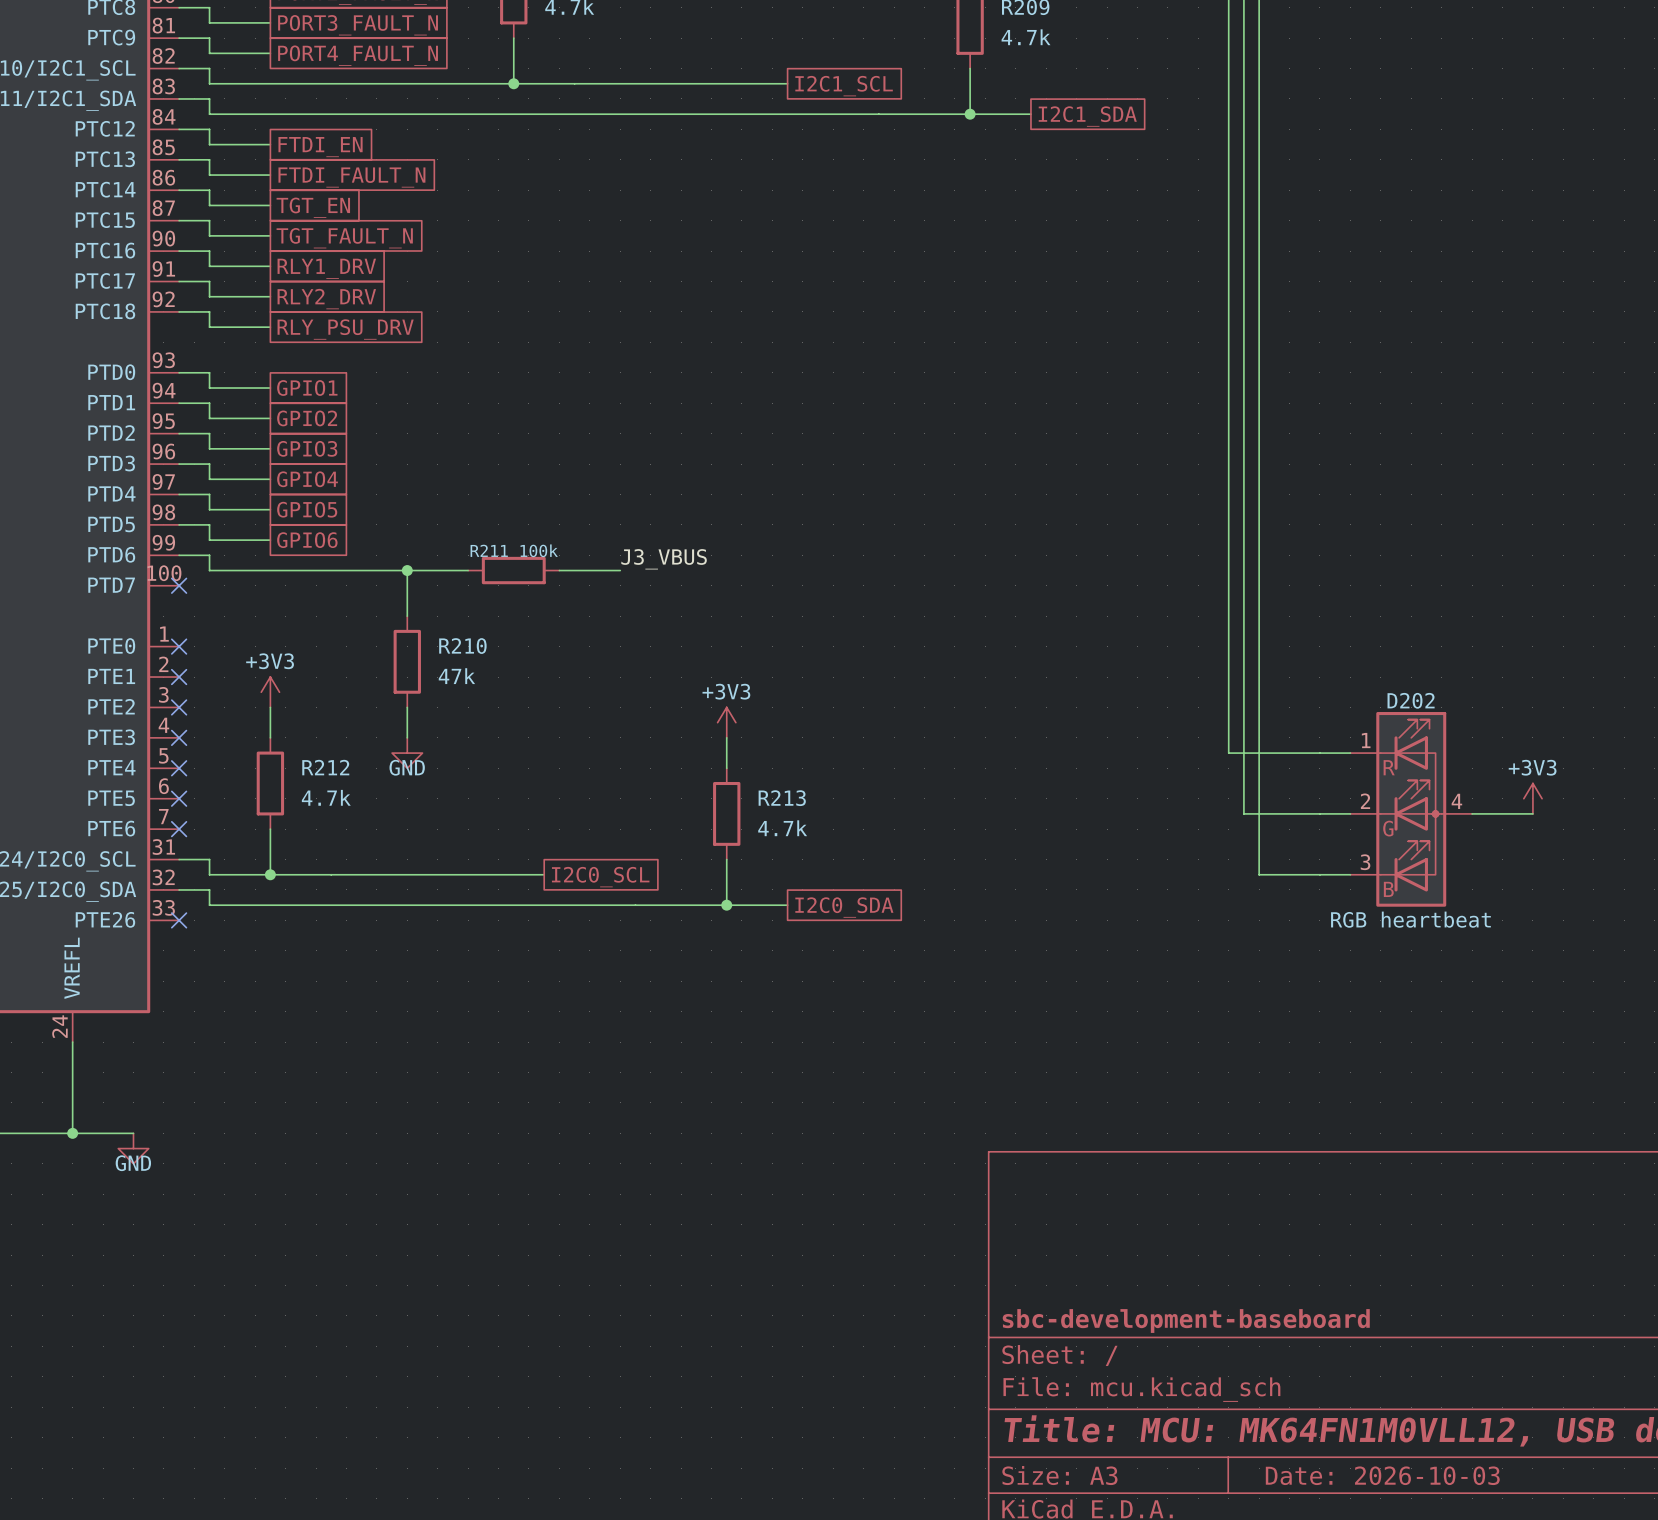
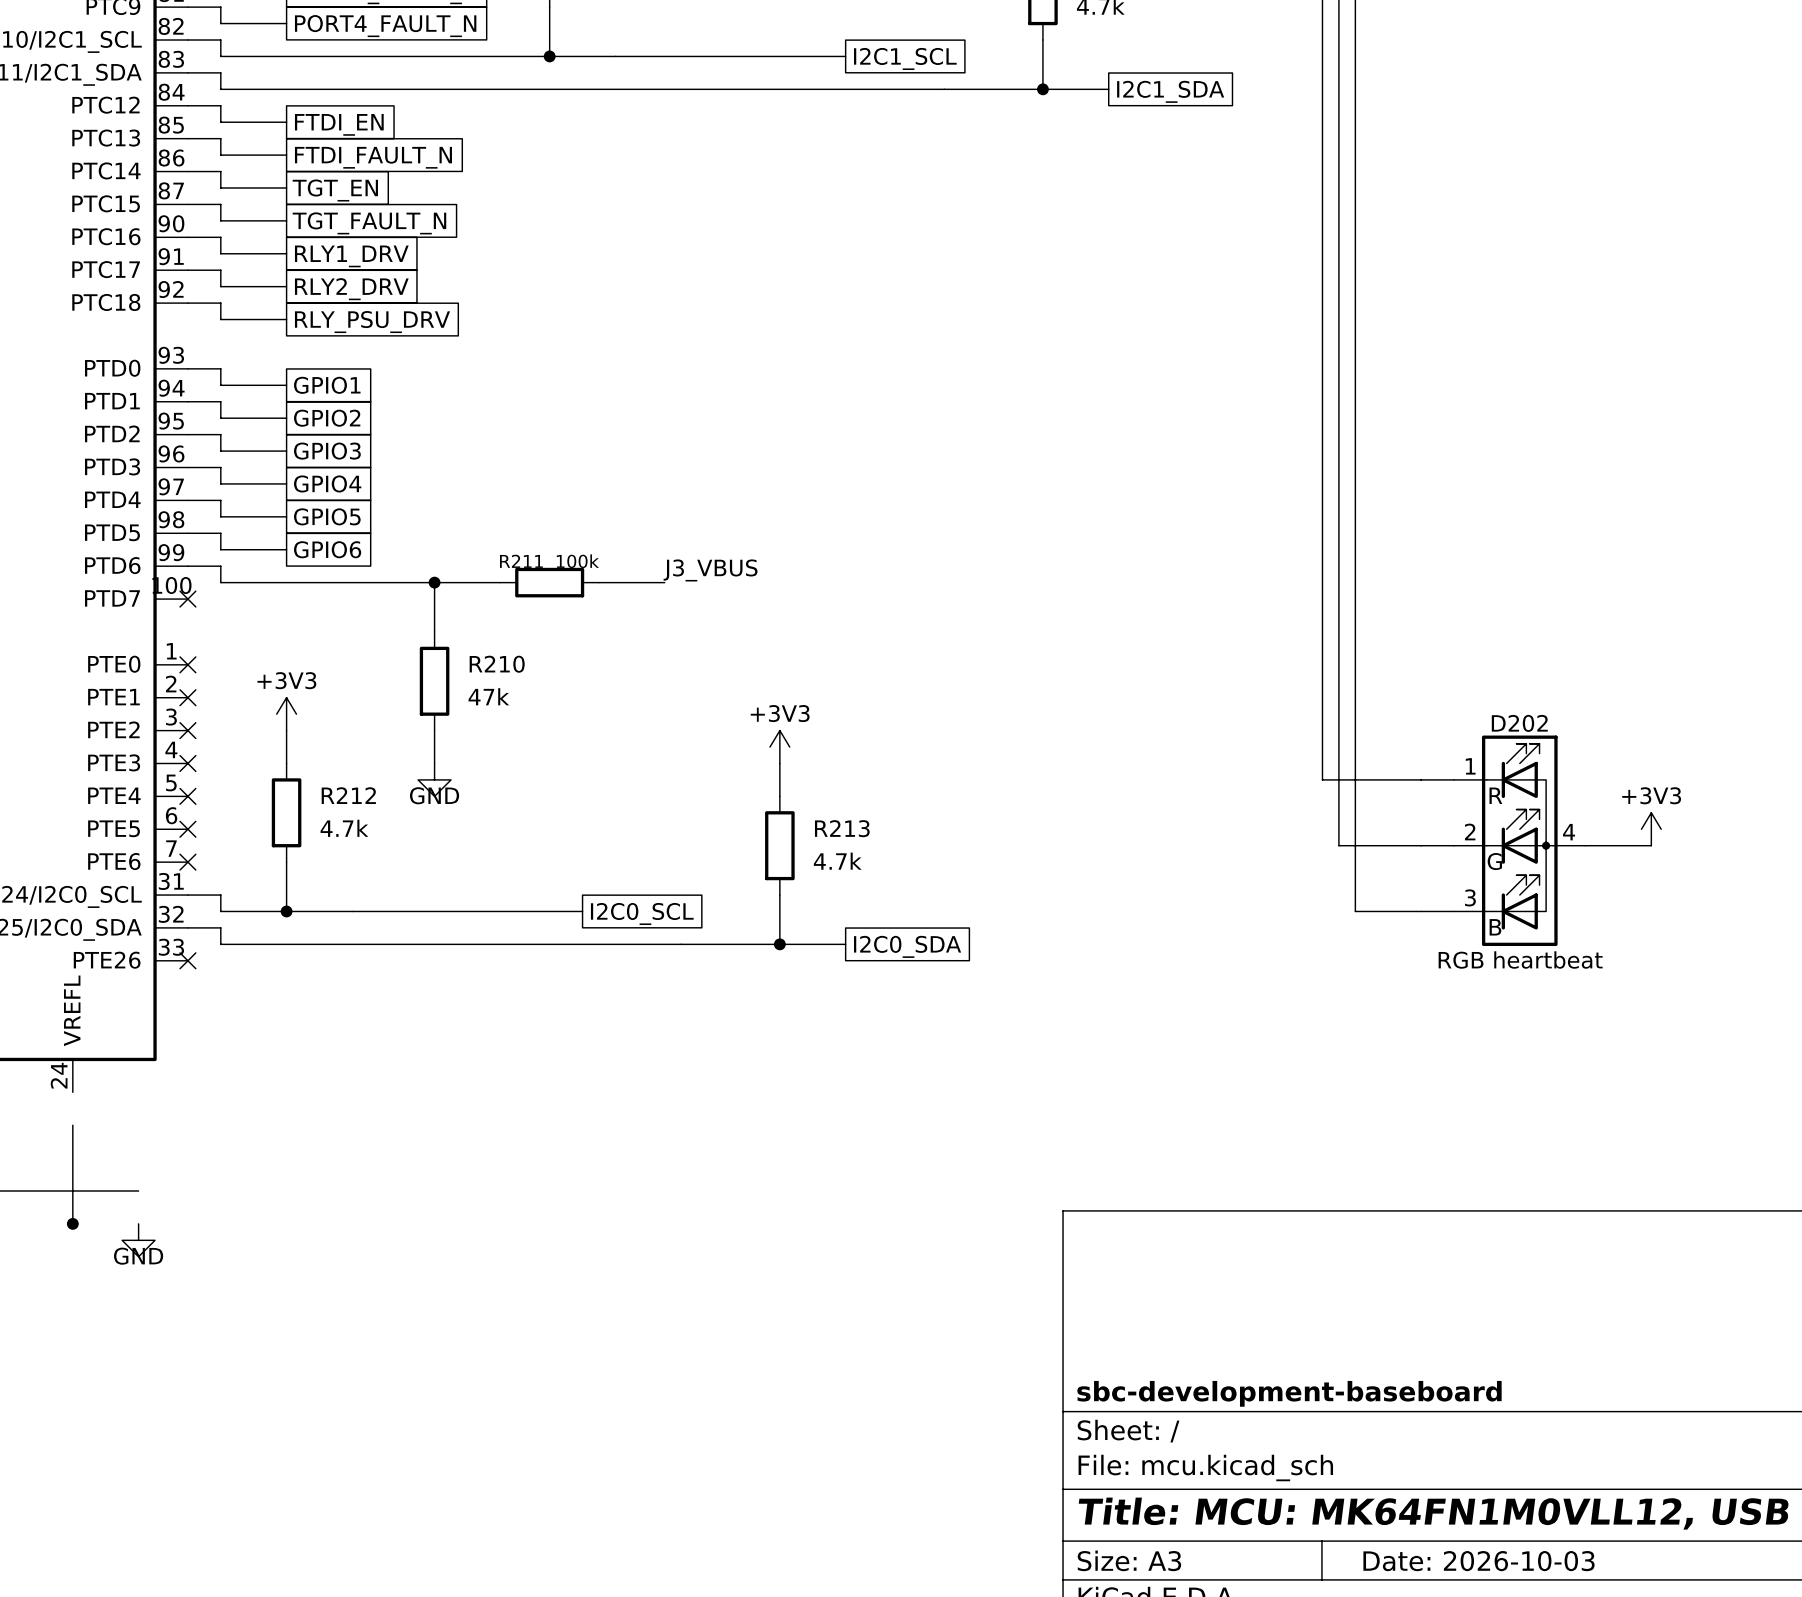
wire: (72, 1042) (72, 1072) -> (72, 1191) (72, 1223)
junction position: (72, 1133) -> (72, 1223)
power symbol position: GND (133, 1148) -> GND (138, 1240)

